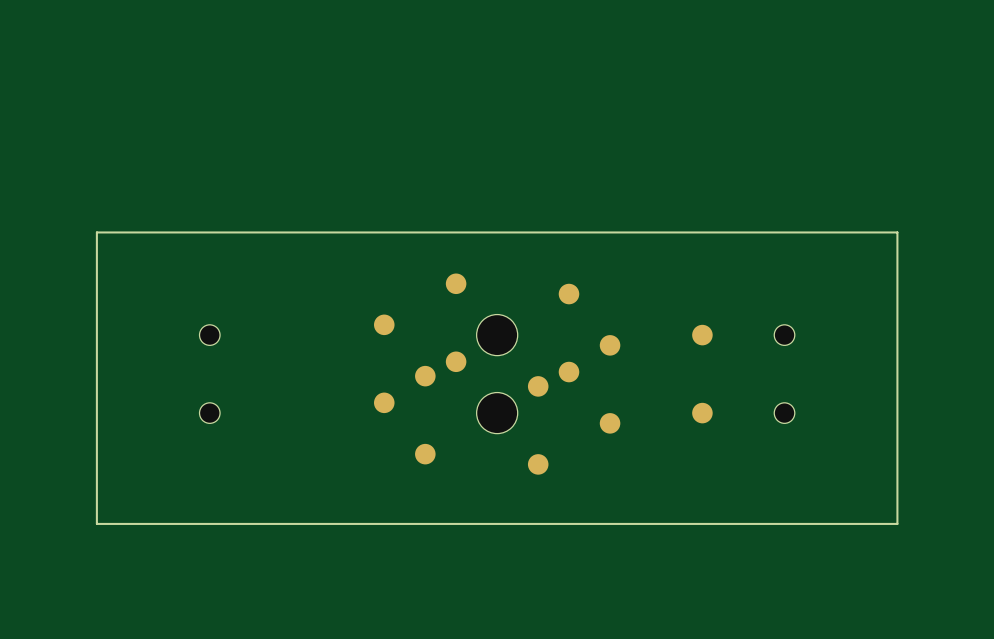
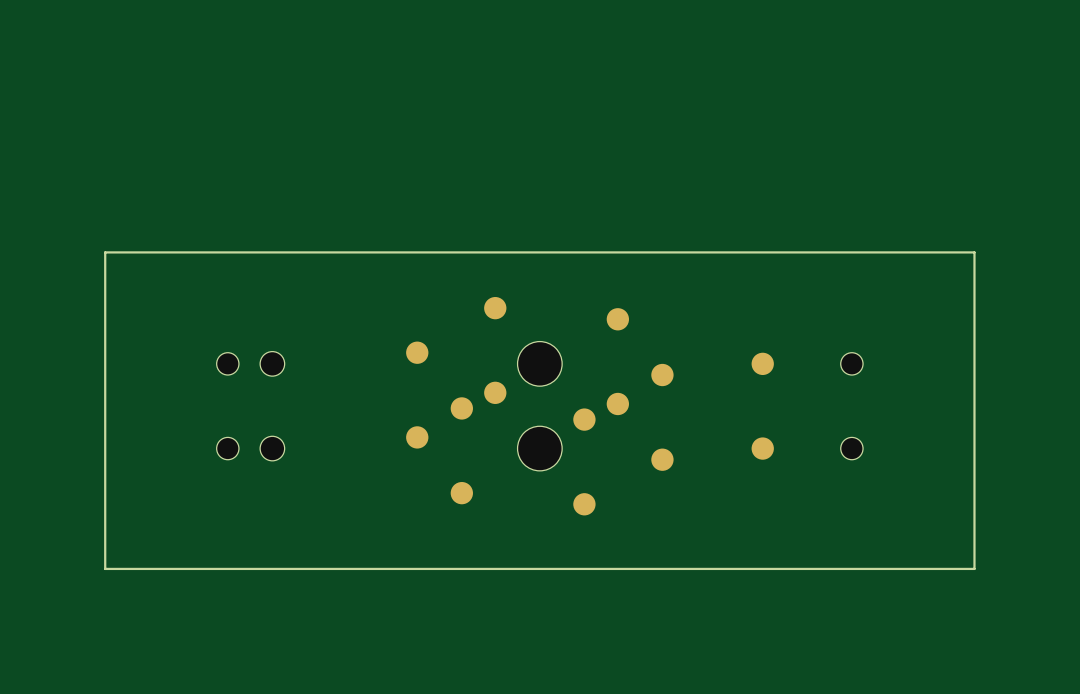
part: none -> (272, 363)
part: none -> (272, 448)

